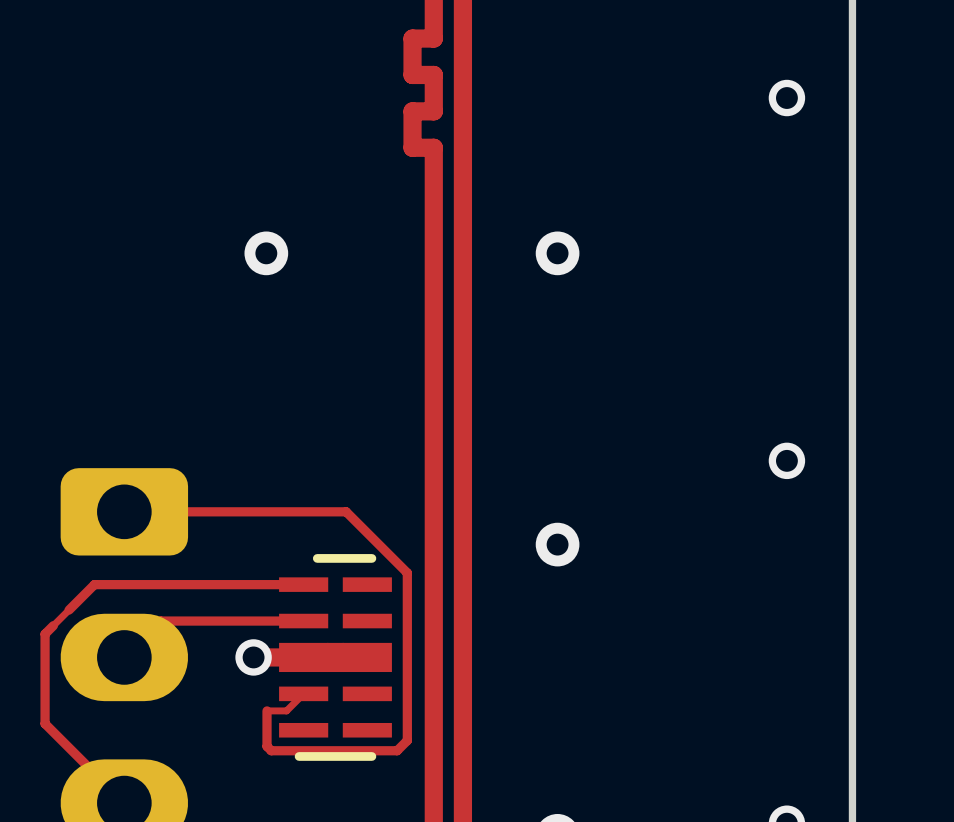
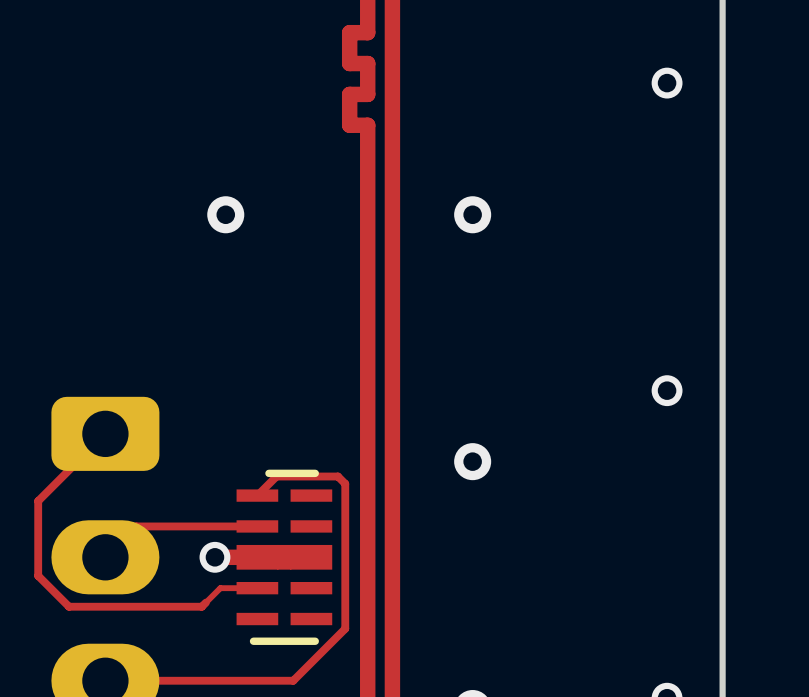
track: (124, 511) (346, 511) (407, 572) -> (257, 495) (276, 476) (337, 476) (345, 485)
track: (303, 584) (94, 584) (45, 634) -> (105, 433) (38, 501) (38, 537)
track: (45, 679) (45, 723) (124, 803) -> (38, 575) (69, 606) (201, 606) (220, 588) (257, 588)
track: (303, 693) (286, 710) (267, 710) (267, 746) (271, 750) (397, 750) (407, 740) -> (105, 680) (293, 680) (345, 628)

